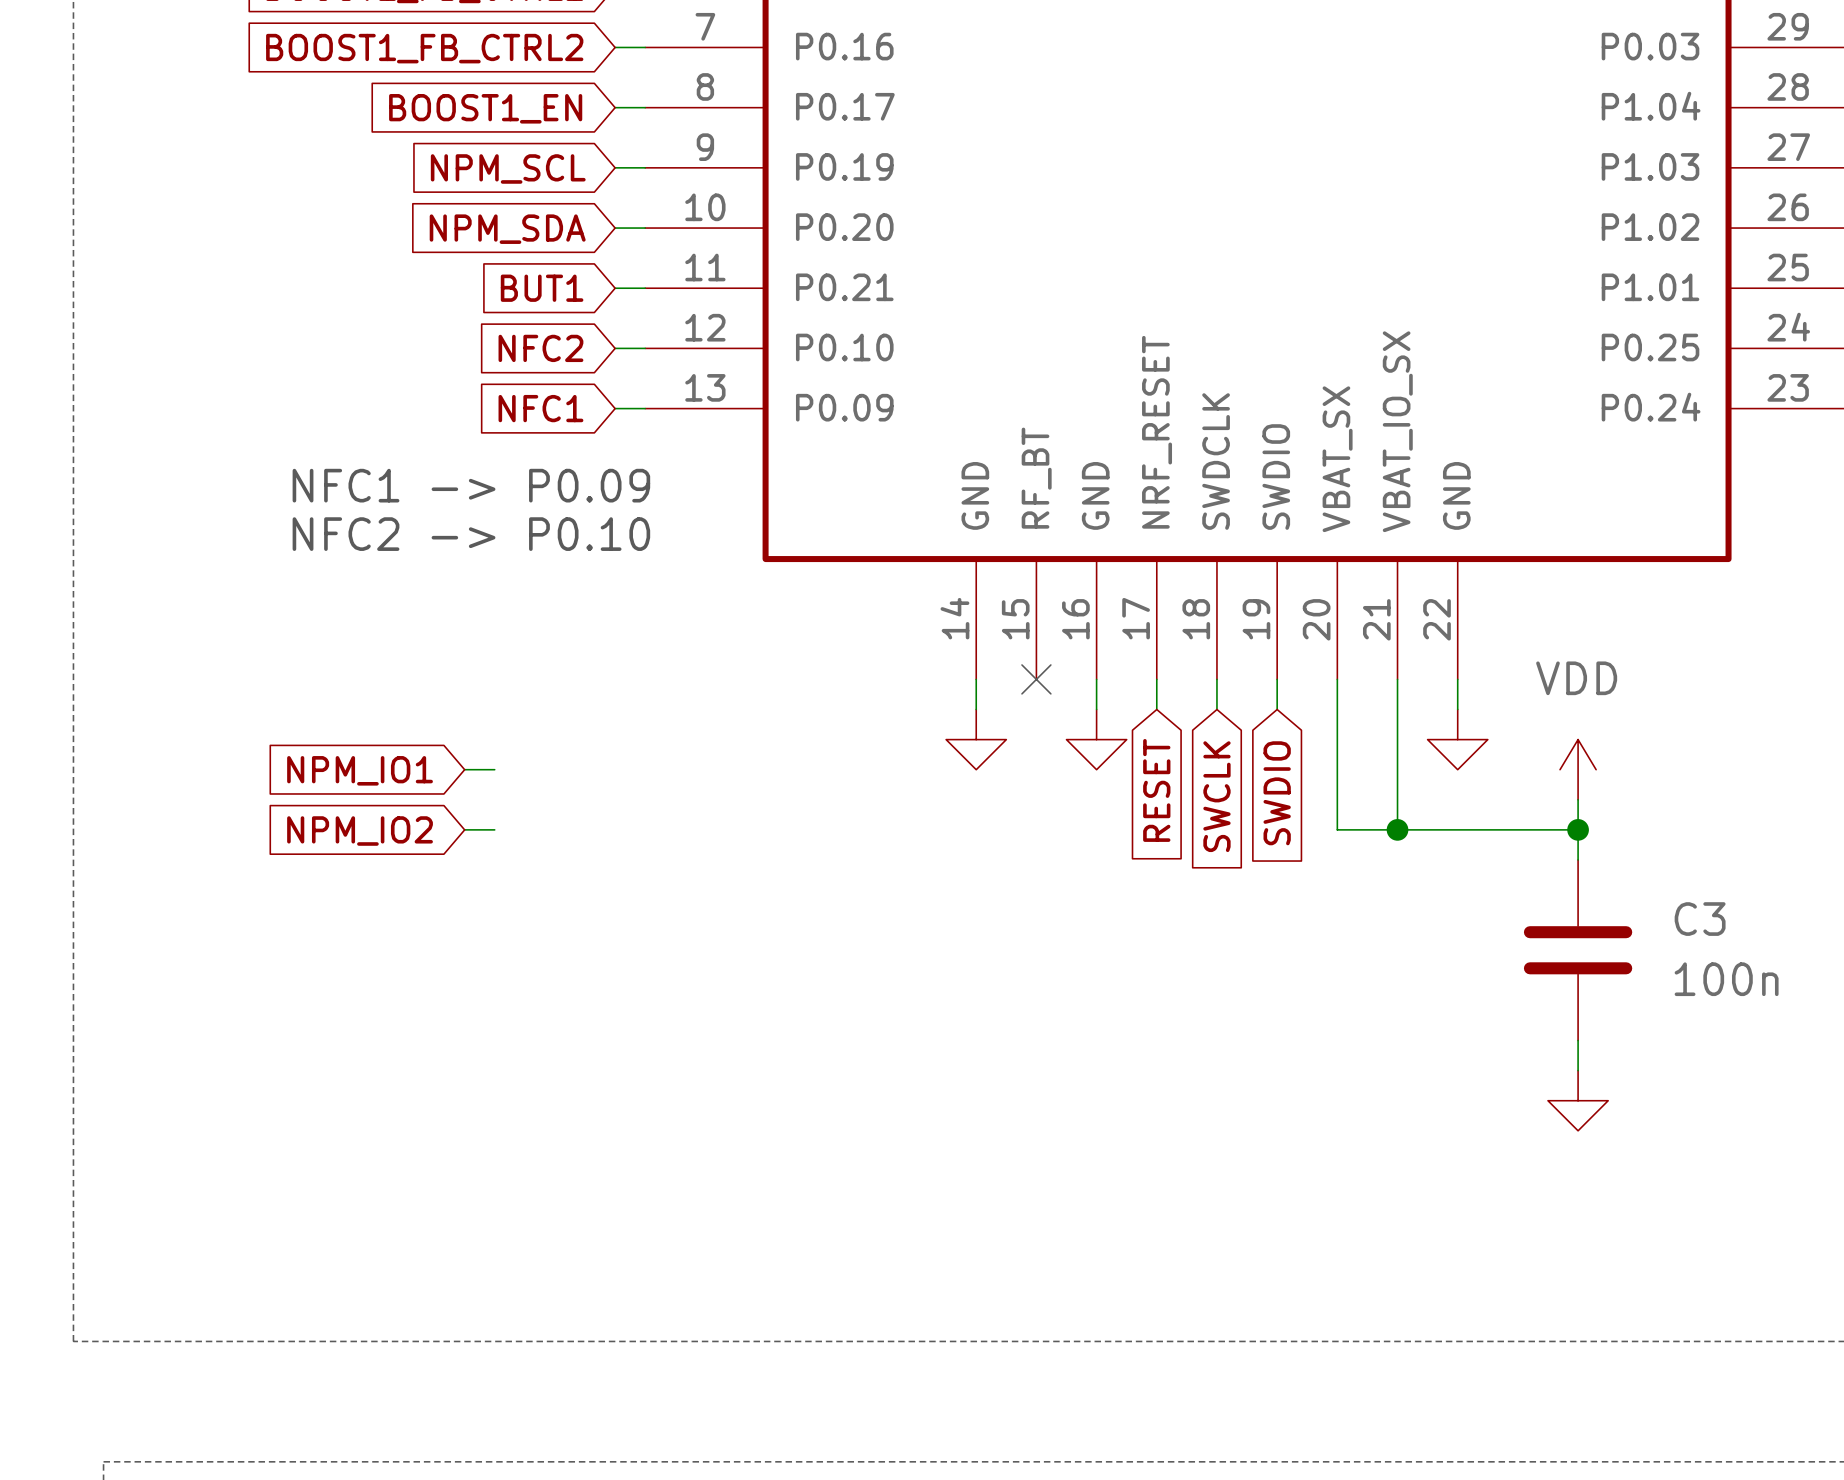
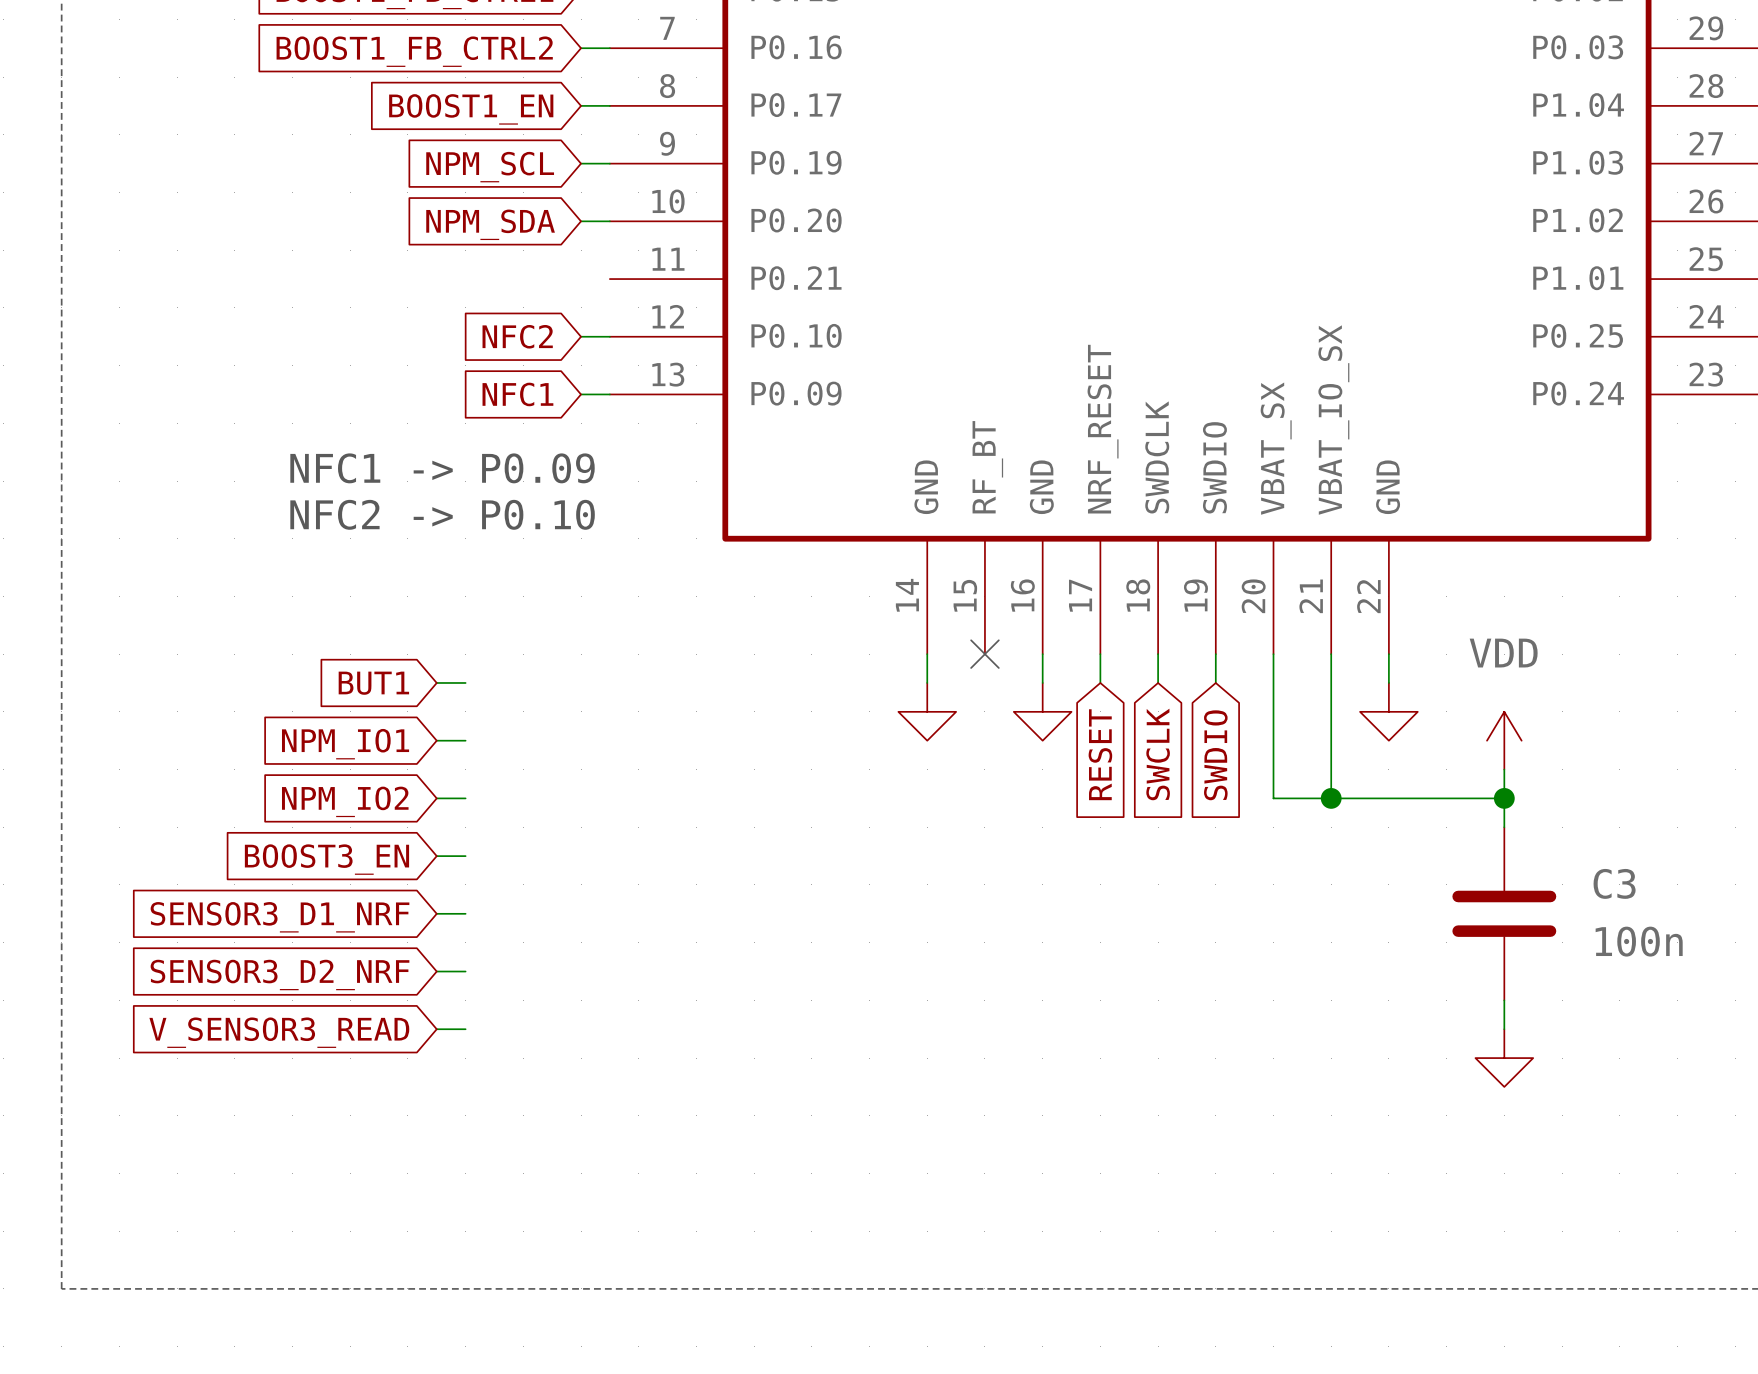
global label position: BUT1 (542, 288) -> BUT1 (373, 683)
wire: (615, 288) (645, 288) -> (436, 682) (465, 682)
wire: none -> (436, 856) (465, 856)
global label: none -> BOOST3_EN (326, 859)
wire: none -> (436, 913) (465, 913)
global label: none -> SENSOR3_D1_NRF (280, 917)
wire: none -> (436, 971) (465, 971)
global label: none -> SENSOR3_D2_NRF (280, 974)
wire: none -> (436, 1029) (465, 1029)
global label: none -> V_SENSOR3_READ (279, 1032)

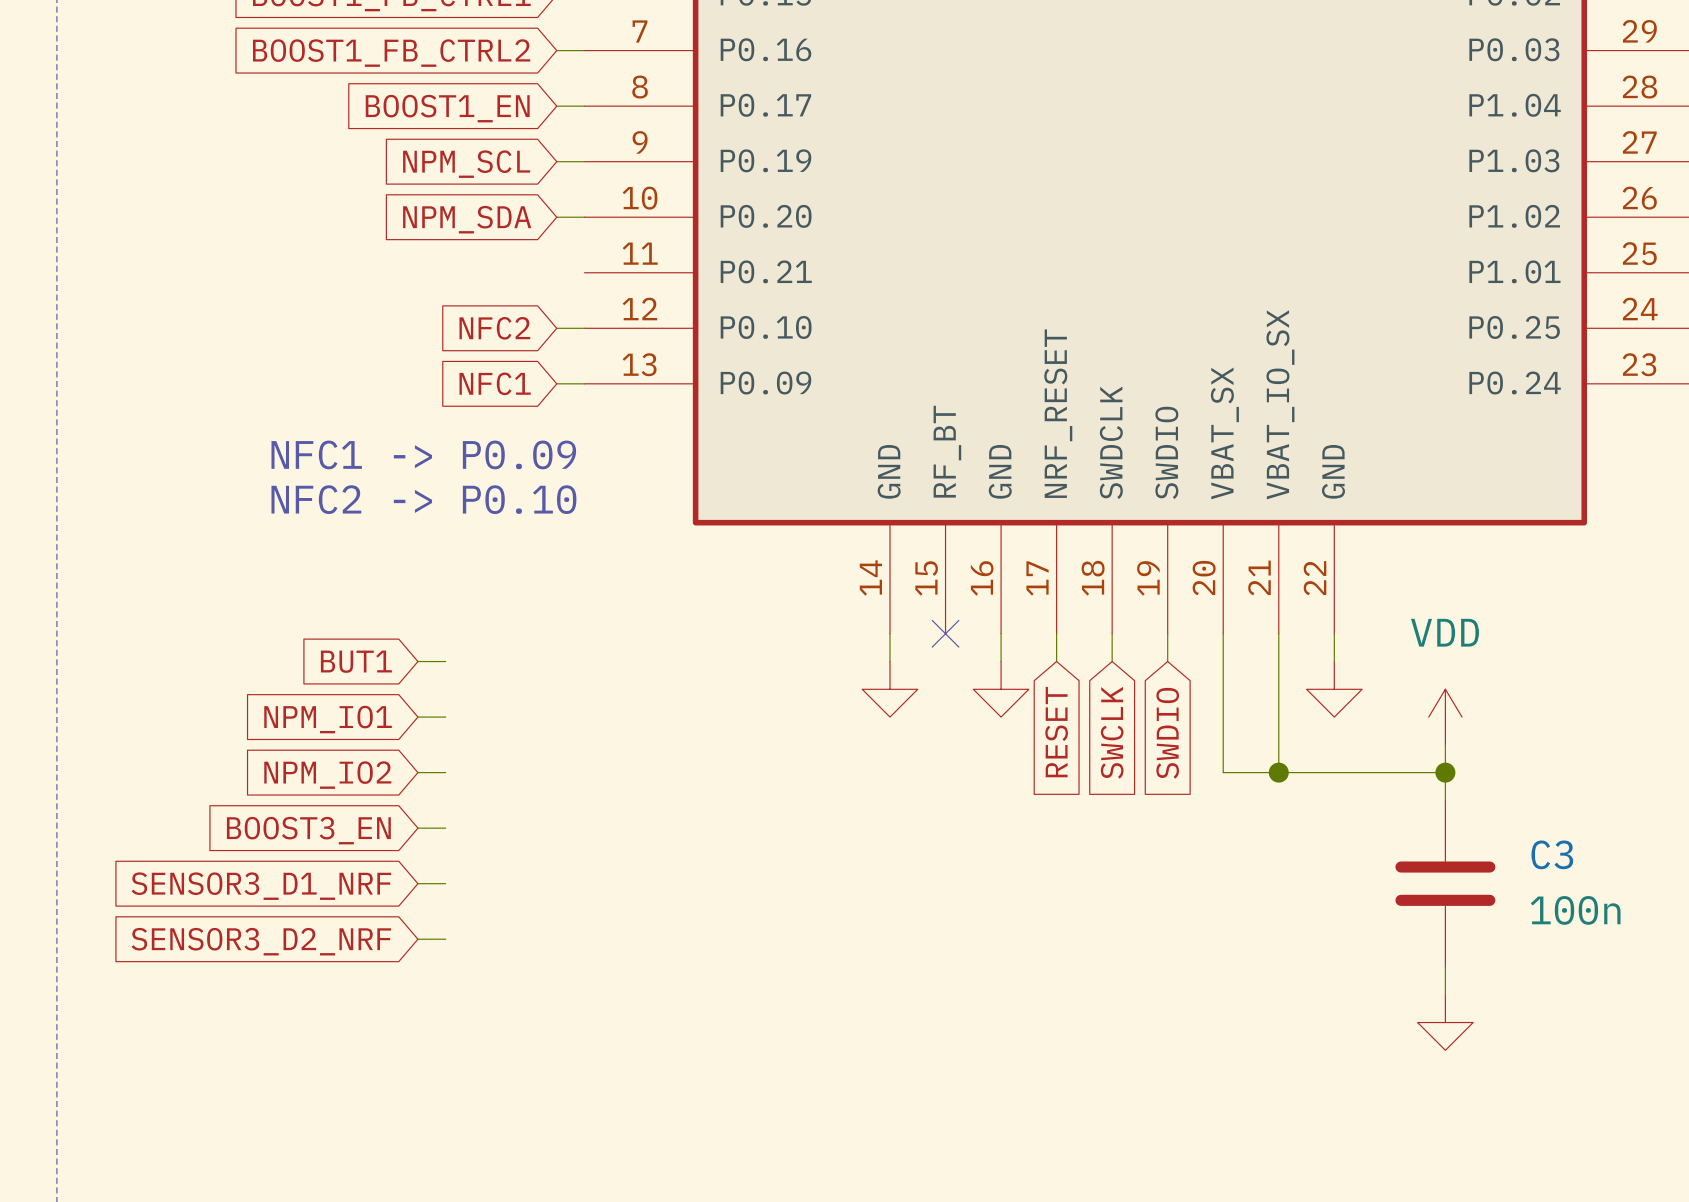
wire: (436, 1029) (465, 1029) -> none
global label: V_SENSOR3_READ (279, 1032) -> none

